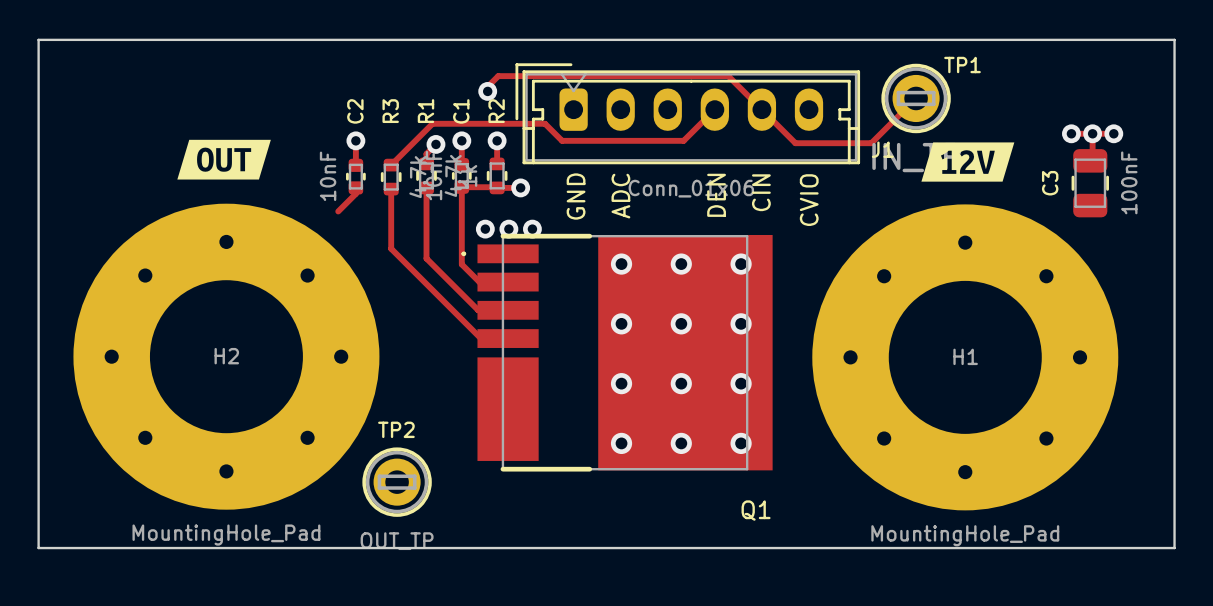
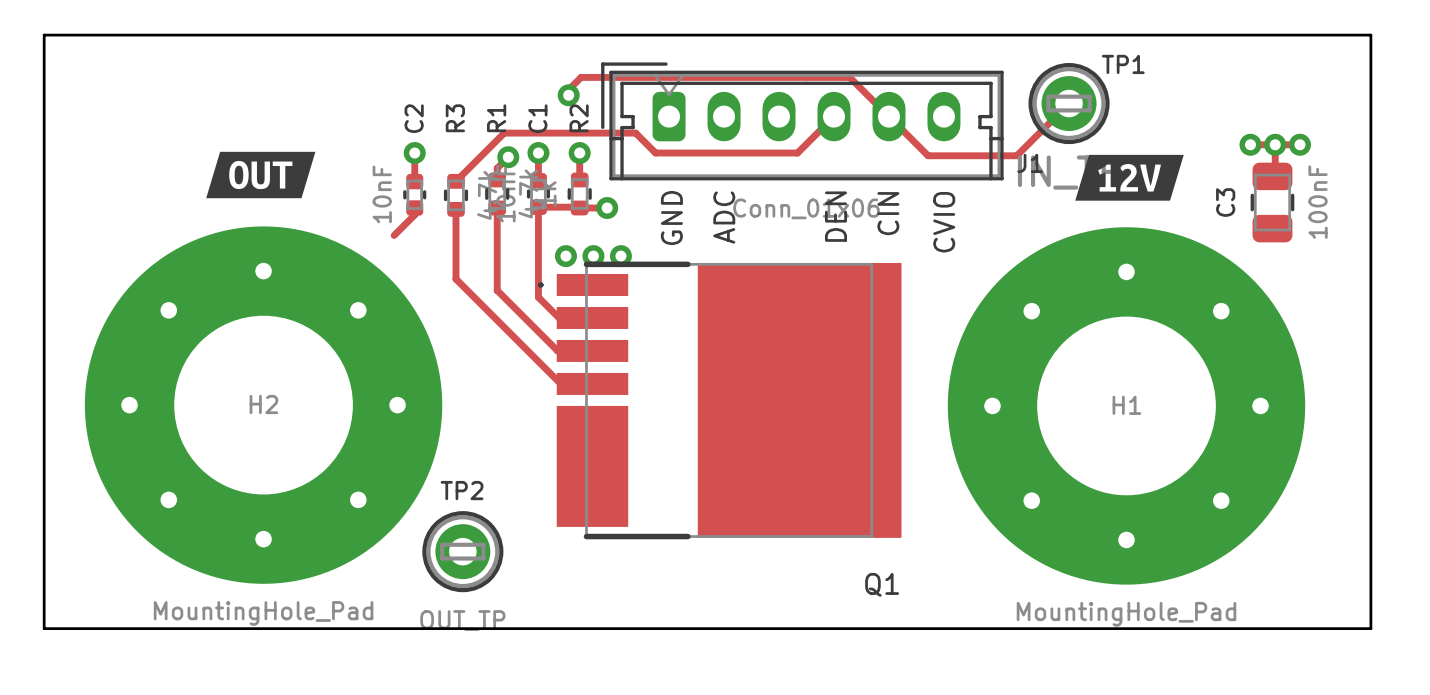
via: (621, 264) -> none
via: (681, 264) -> none
via: (741, 264) -> none
via: (621, 323) -> none
via: (681, 323) -> none
via: (741, 323) -> none
via: (621, 383) -> none
via: (681, 383) -> none
via: (741, 383) -> none
via: (621, 443) -> none
via: (681, 443) -> none
via: (741, 443) -> none

